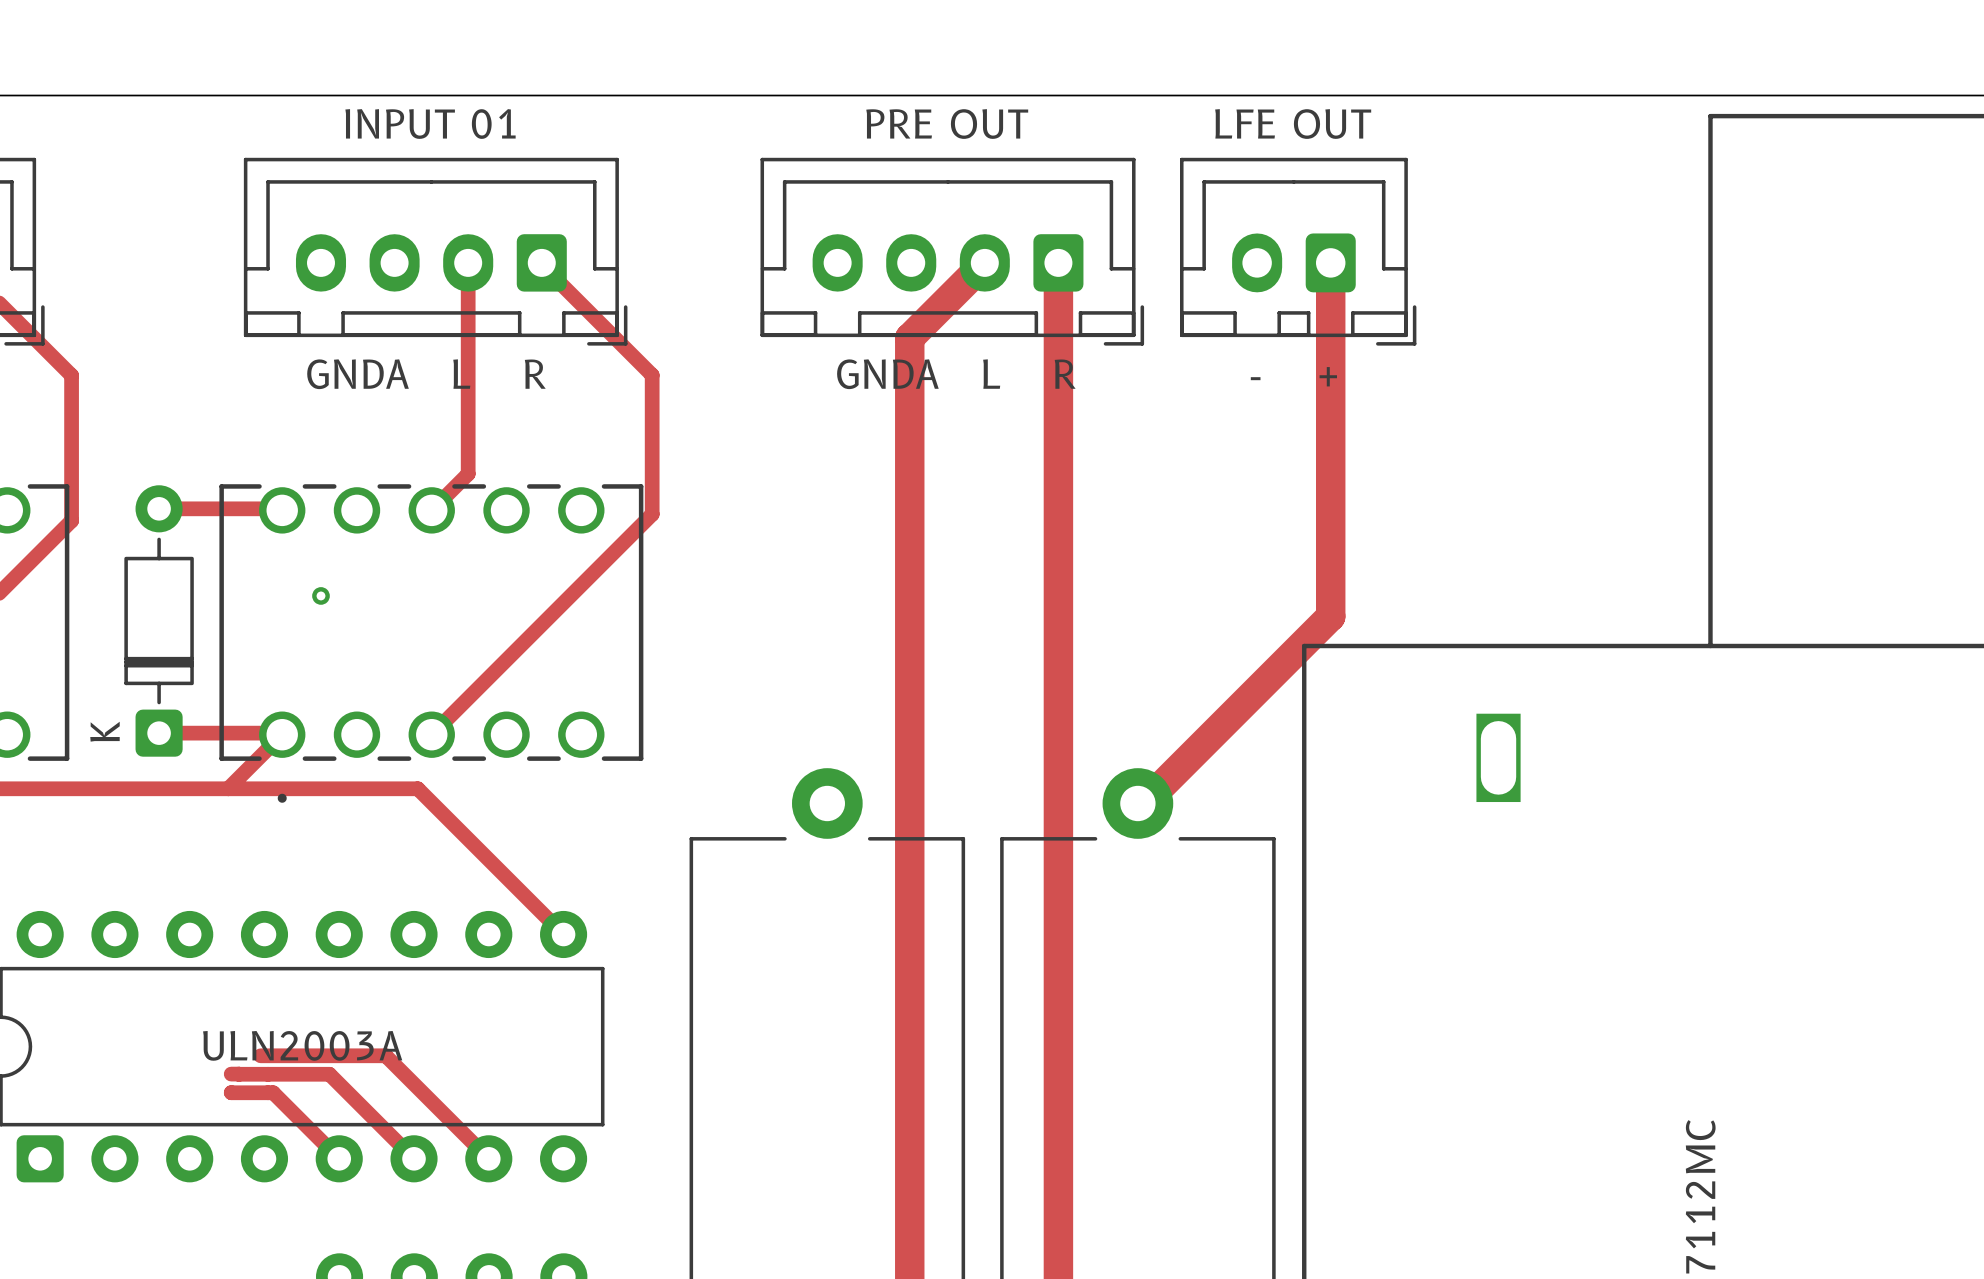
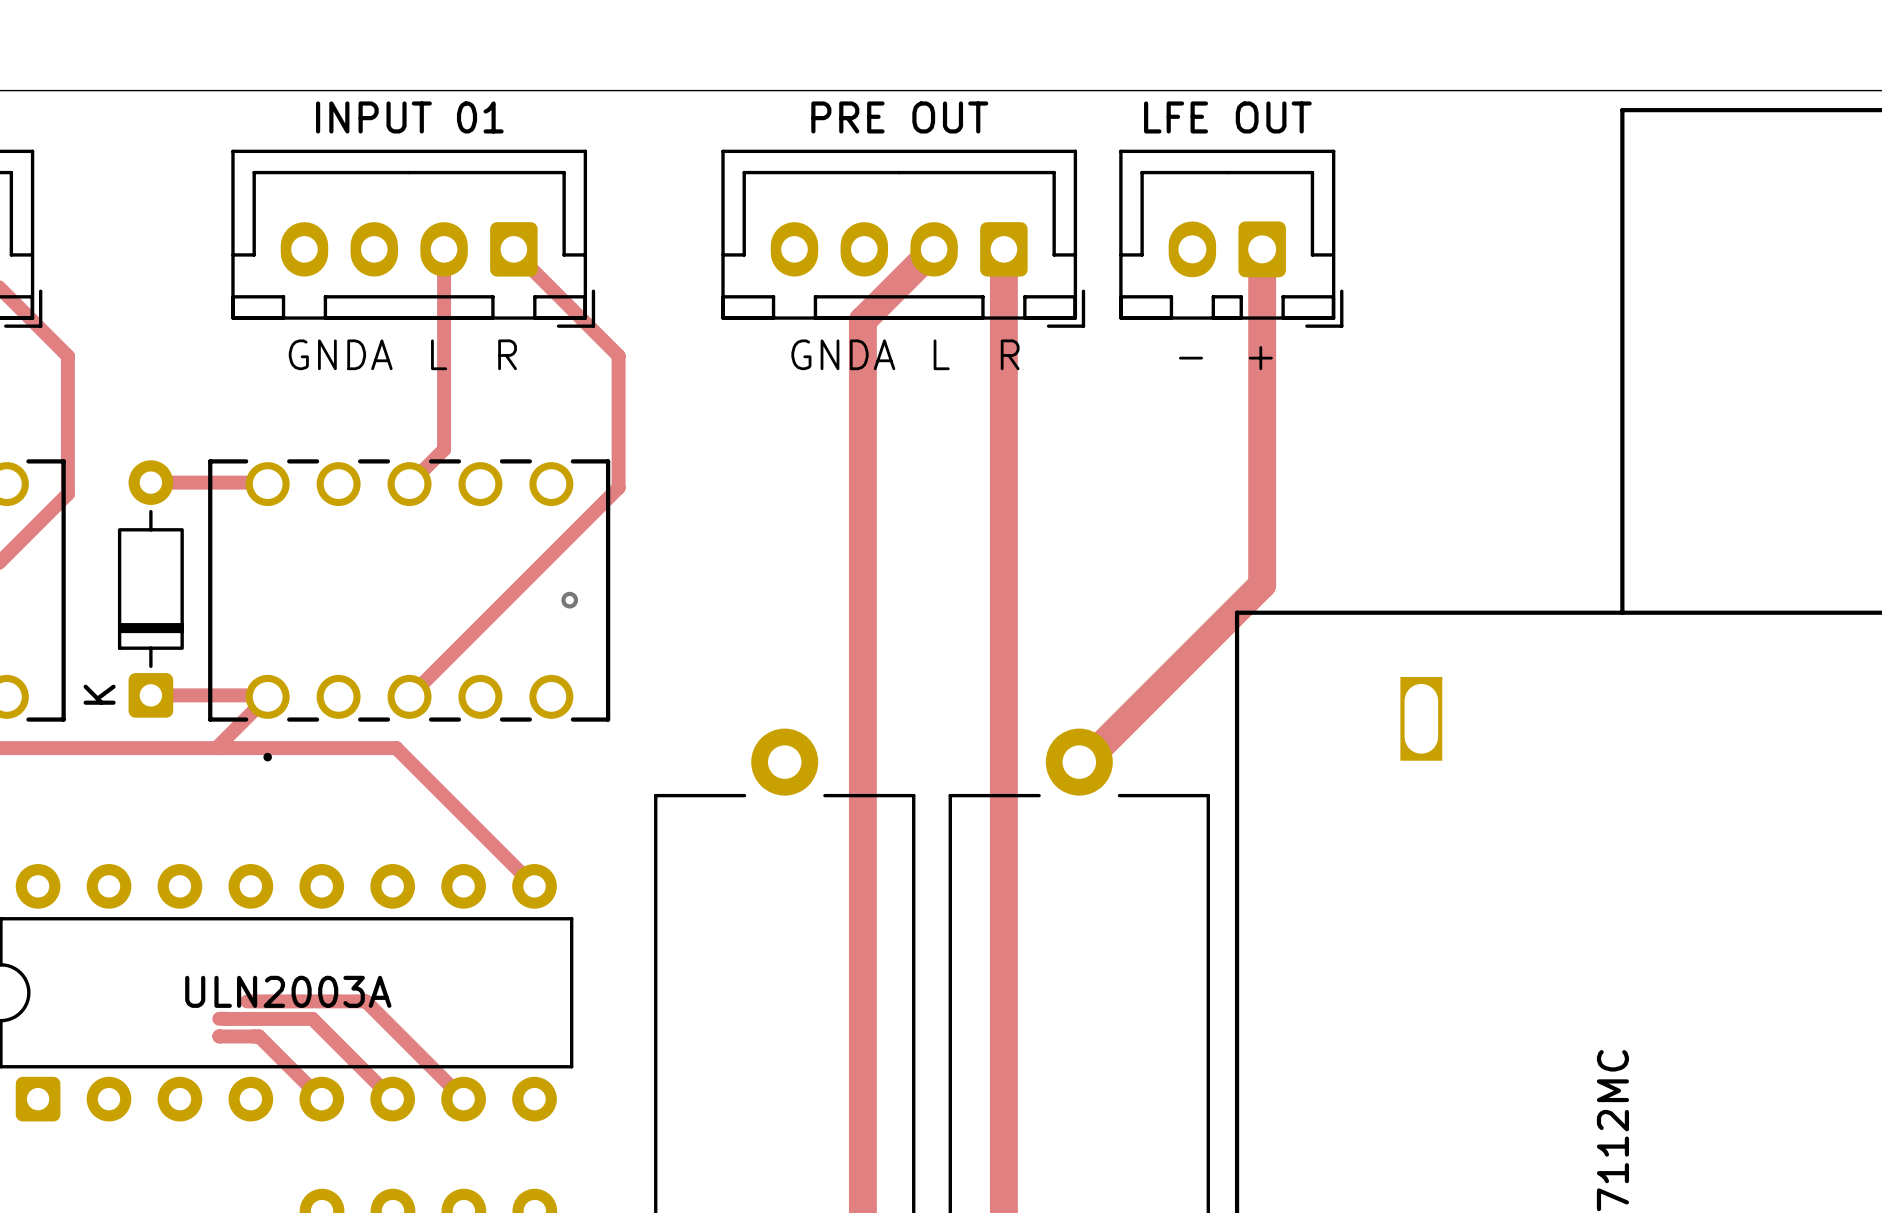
via: (320, 595) -> none
via: none -> (569, 600)

